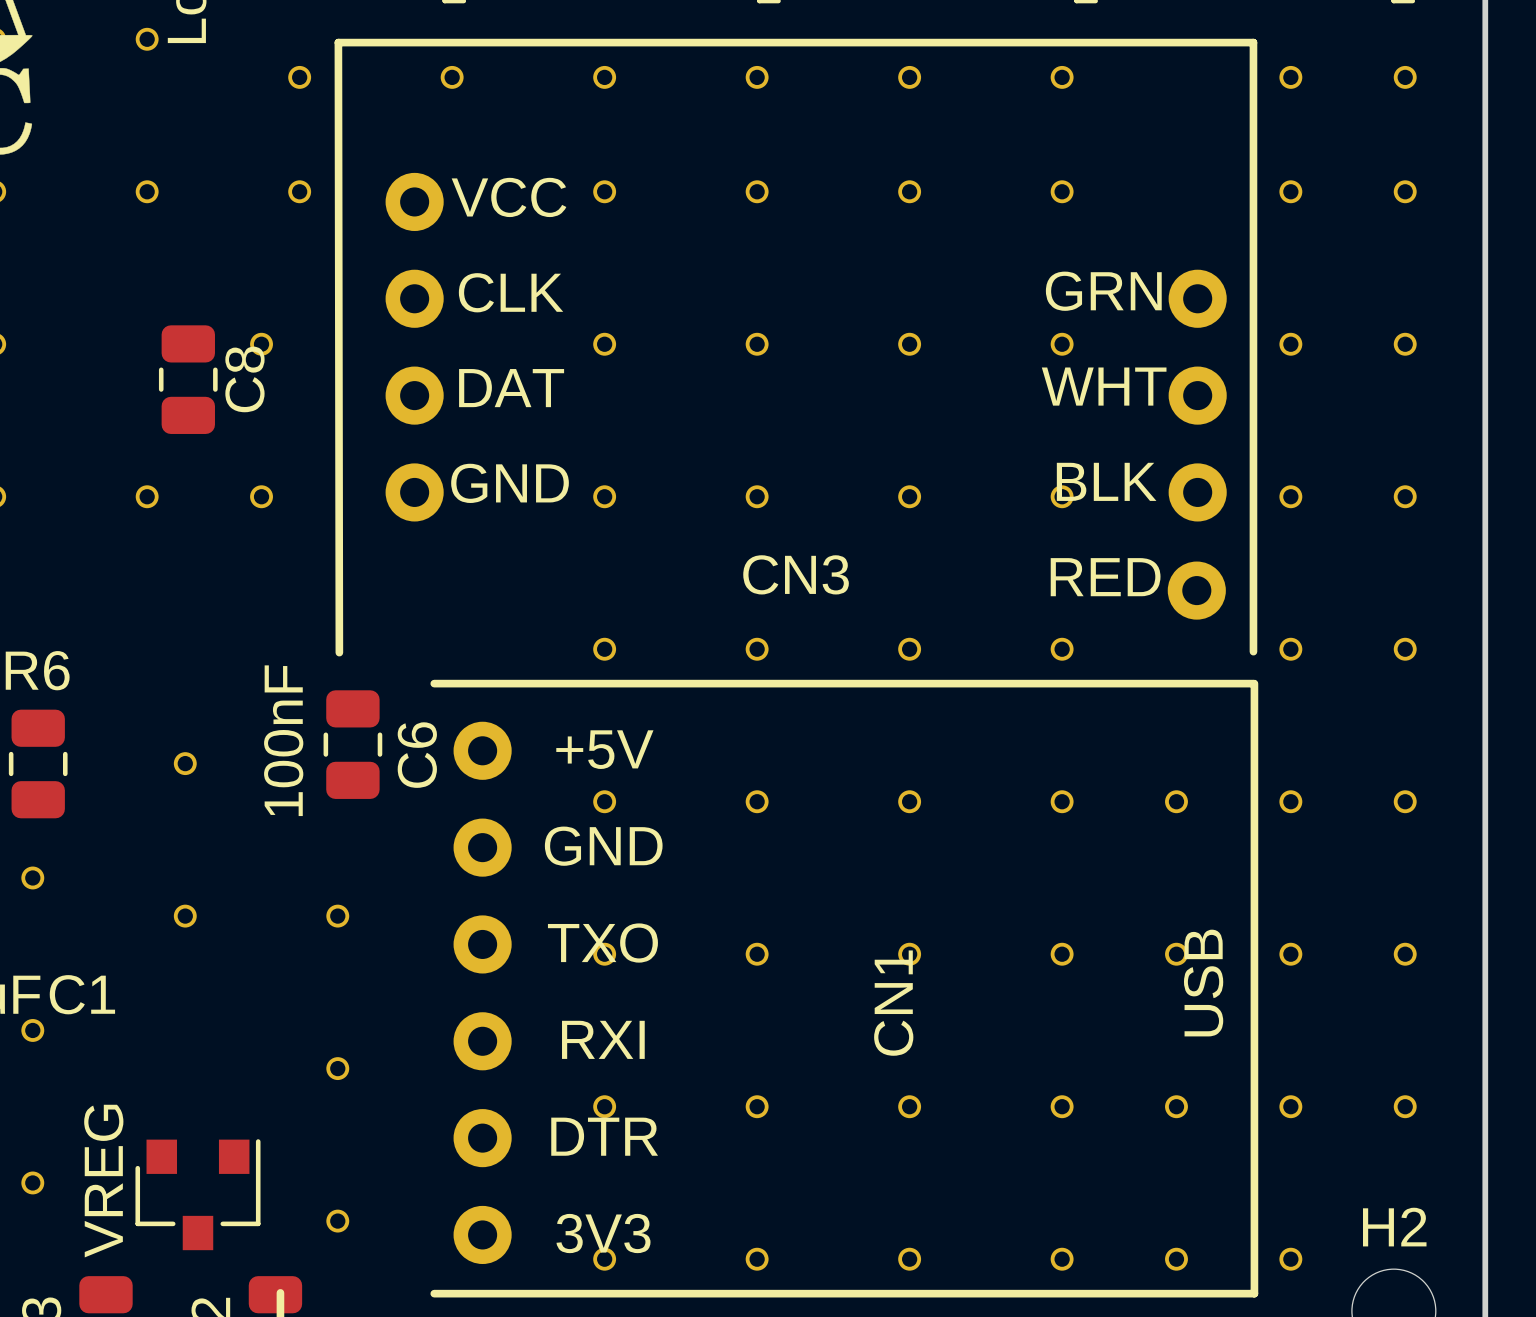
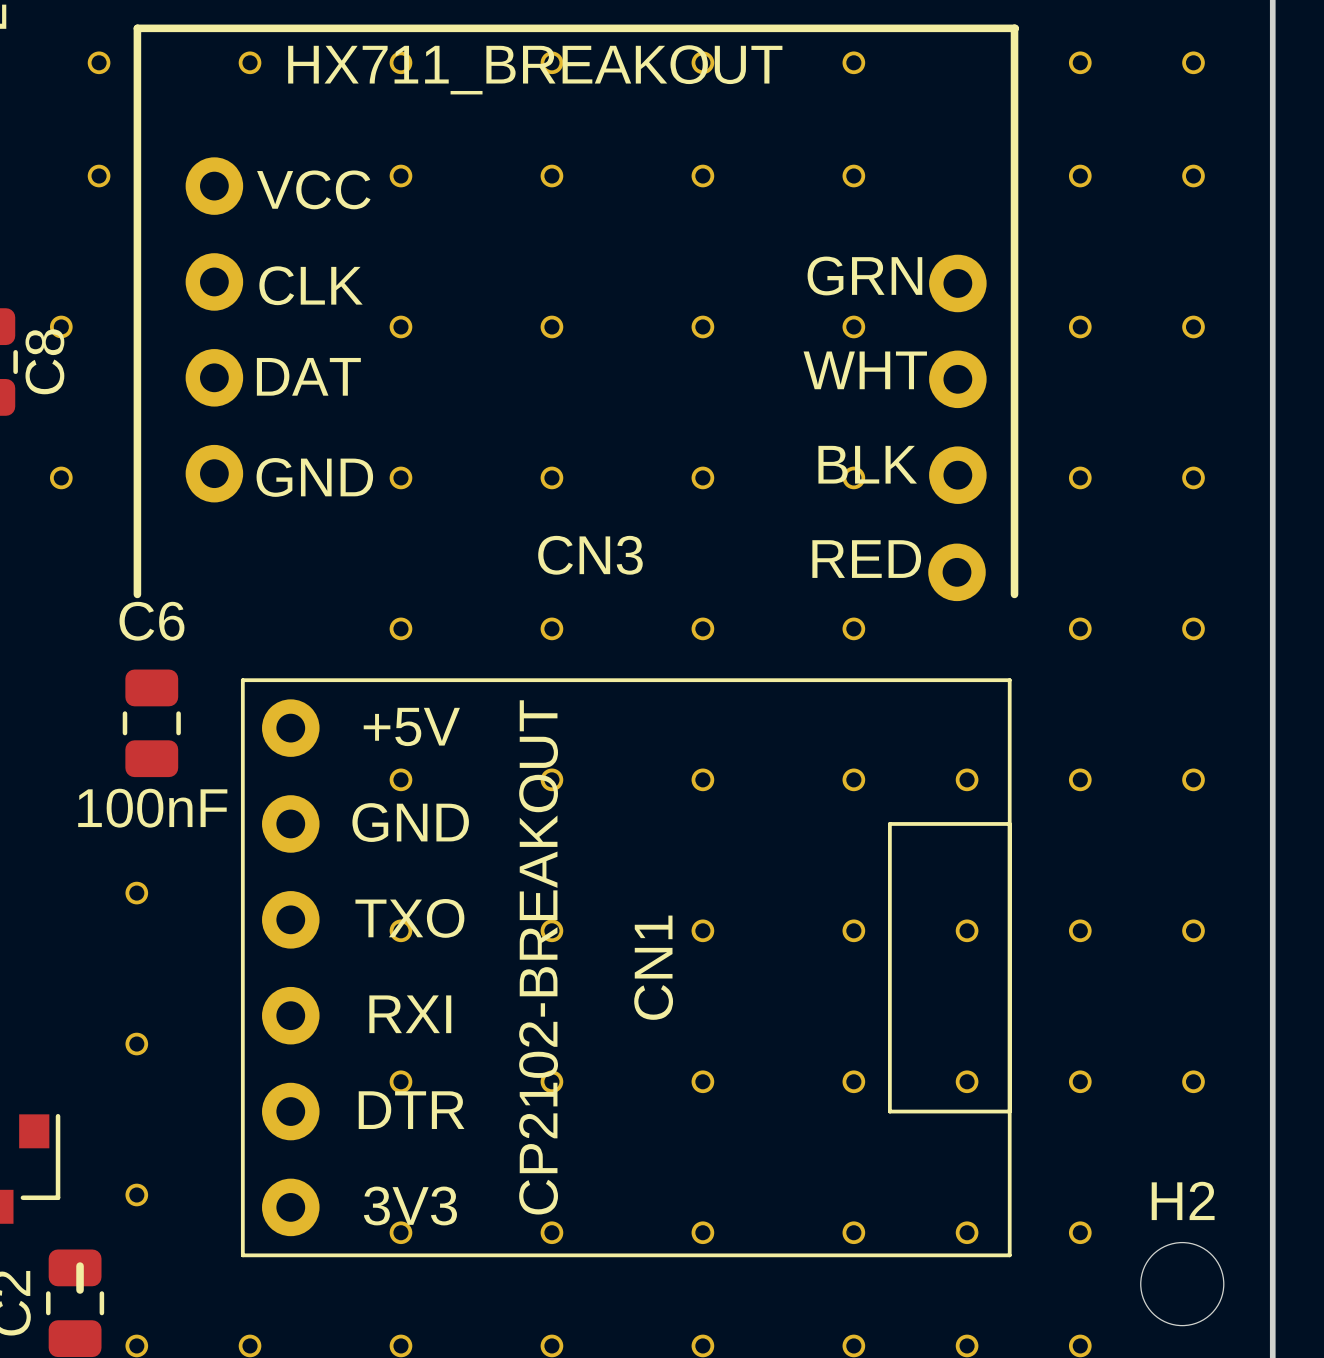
line: (338, 42) (339, 652) -> (137, 28) (137, 594)
line: (1225, 42) (1253, 42) (1253, 651) -> (1014, 28) (1014, 594)
CN3 value: none -> HX711_BREAKOUT (535, 69)
CN3 footprint: [385, 172, 1227, 620] -> [185, 157, 987, 602]
line: (434, 683) (1253, 683) -> none
line: (1254, 683) (1254, 1293) (434, 1293) -> none
CN1 footprint: [453, 721, 1256, 1265] -> [240, 678, 1012, 1258]
C6 value rotation: 0° (283, 740) -> 90° clockwise (152, 808)
C6 name rotation: 0° (417, 755) -> 90° clockwise (151, 621)
C6 name position: C6 (417, 755) -> C6 (151, 621)
CN1 value: none -> CP2102-BREAKOUT (538, 957)

